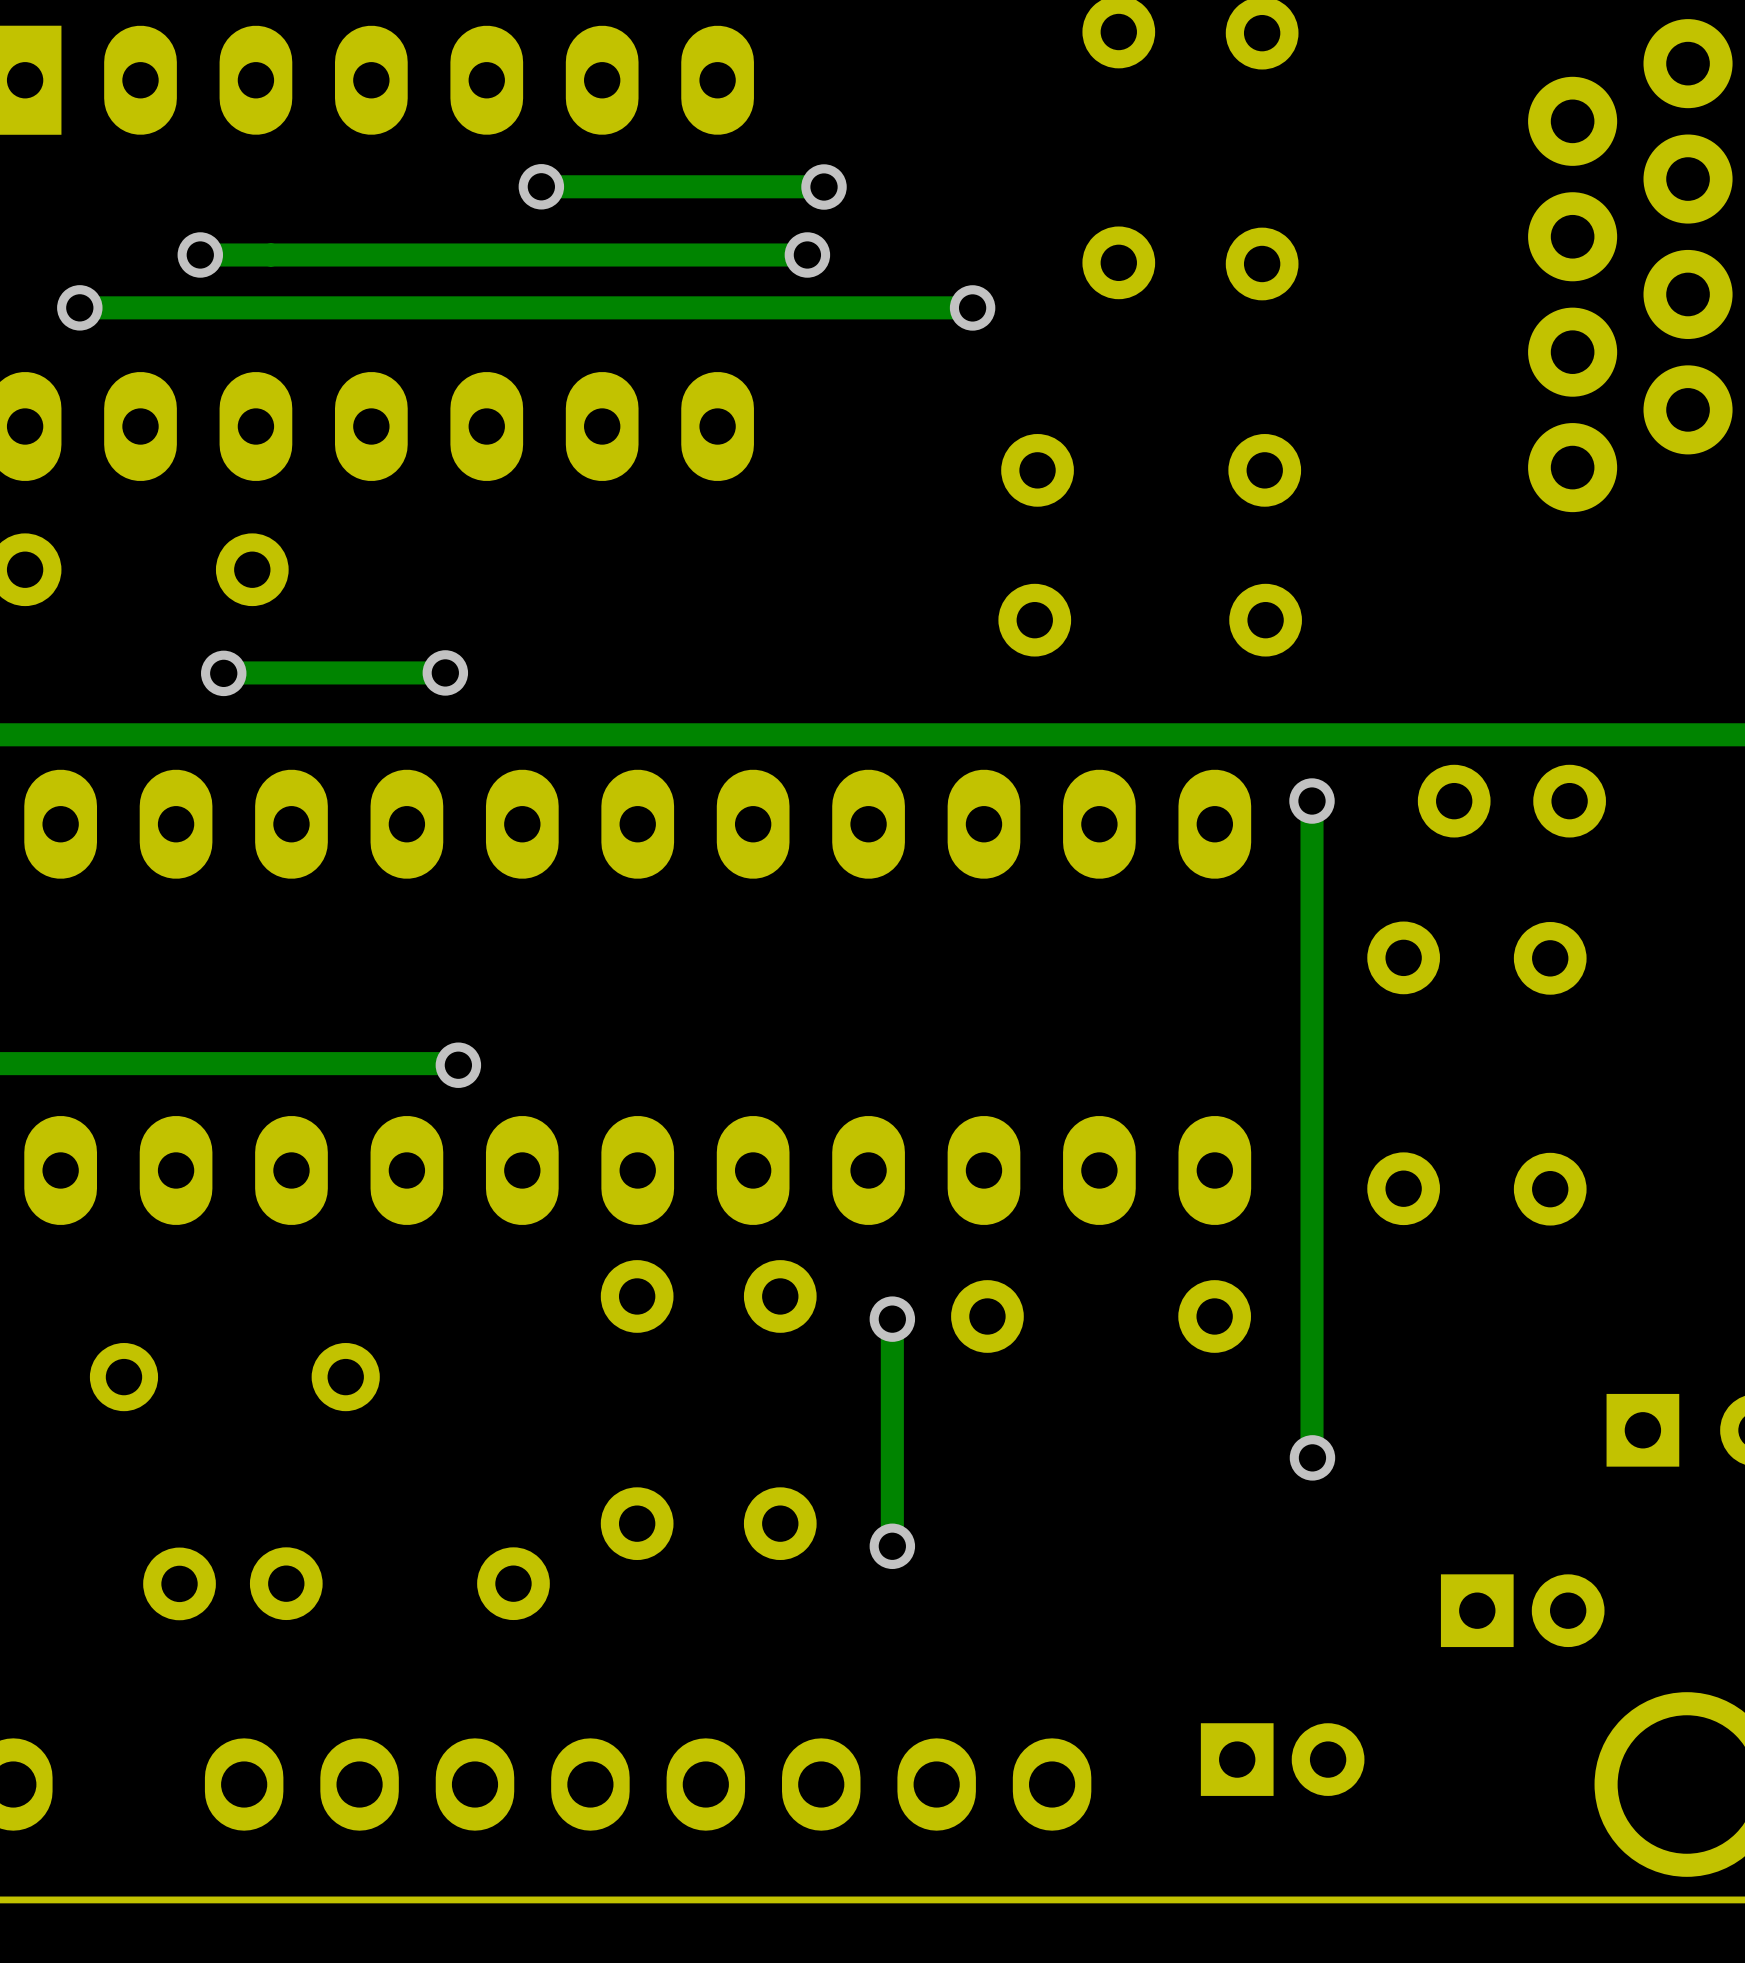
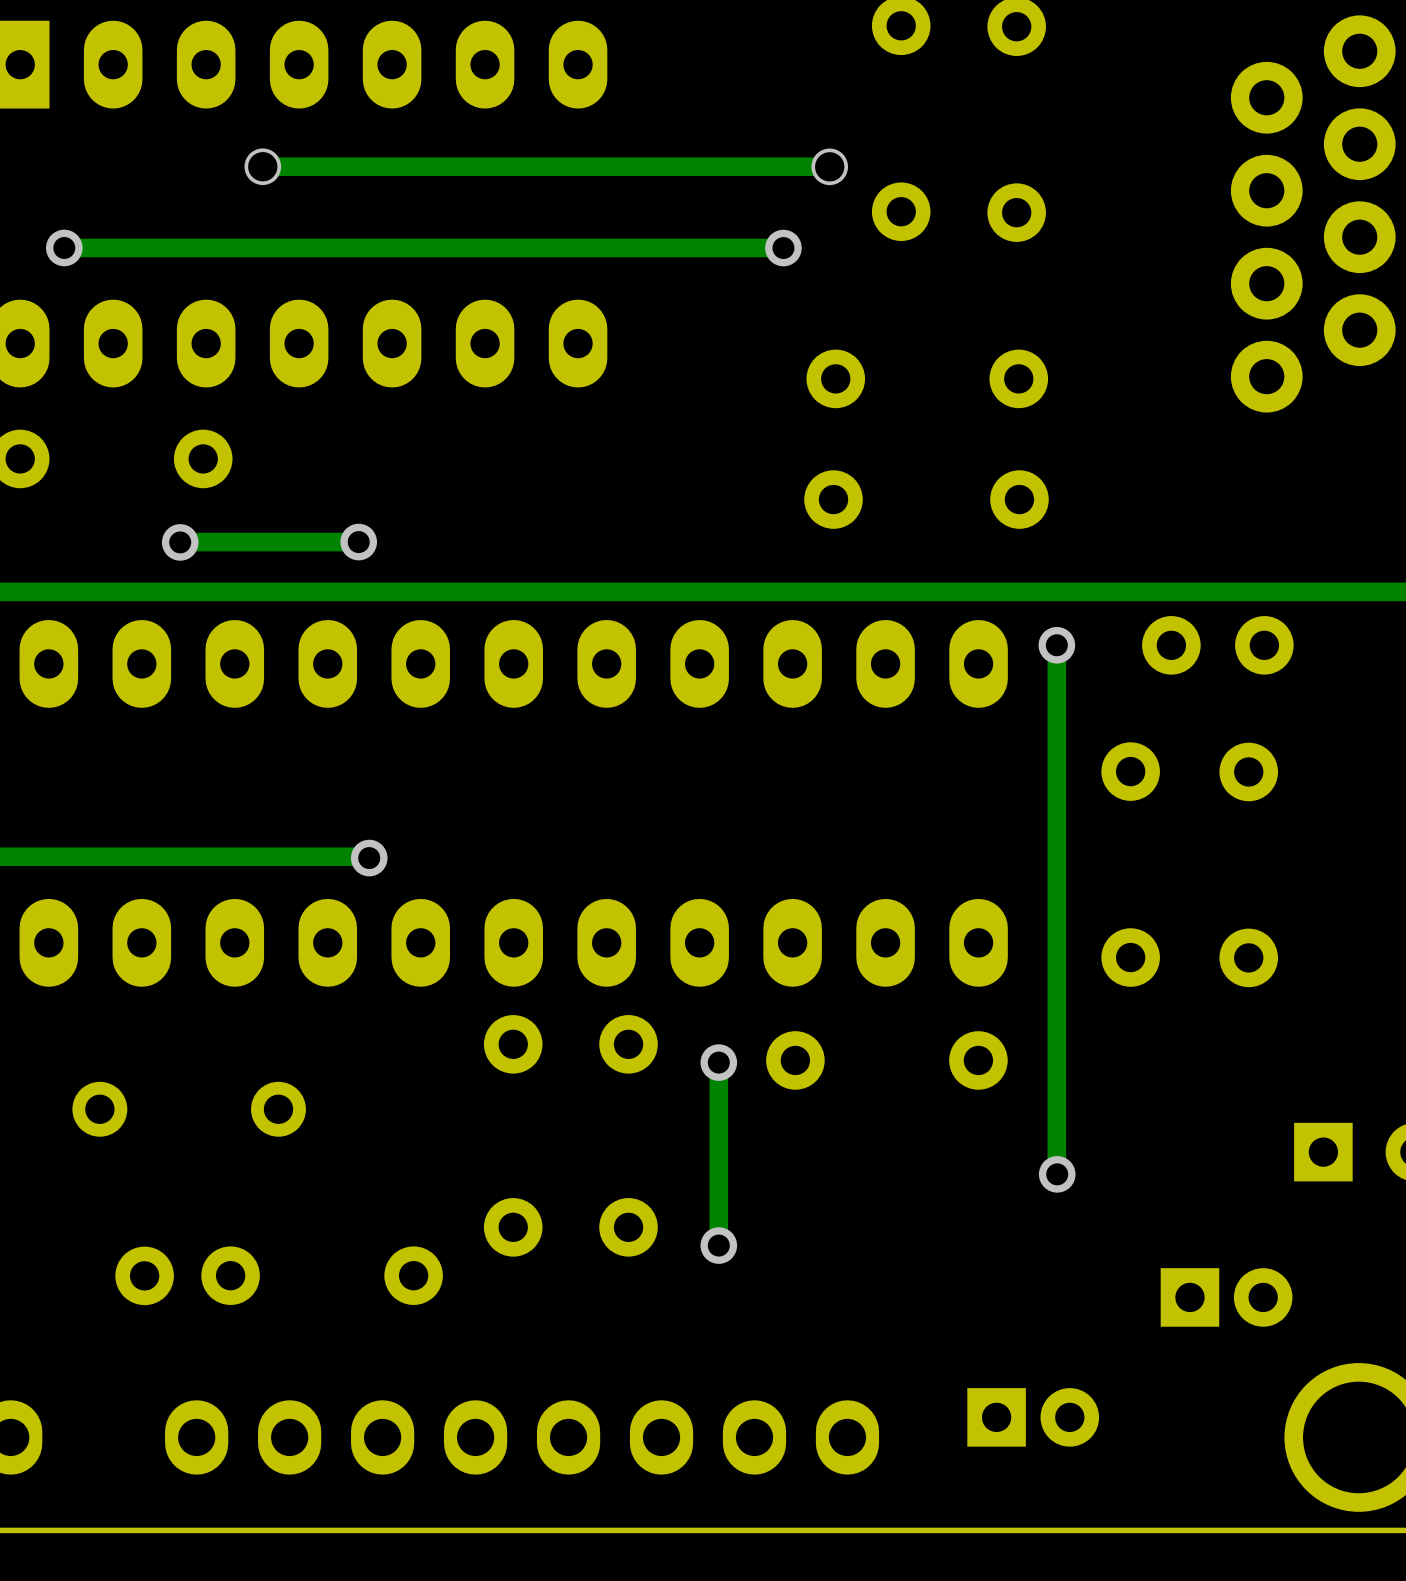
via: (541, 186) -> none
track: (823, 186) (541, 186) -> none
via: (824, 187) -> none
via: none -> (262, 166)
track: none -> (829, 166) (262, 166)
via: none -> (829, 166)
via: (200, 254) -> none
track: (807, 254) (200, 254) -> none
via: (807, 254) -> none

